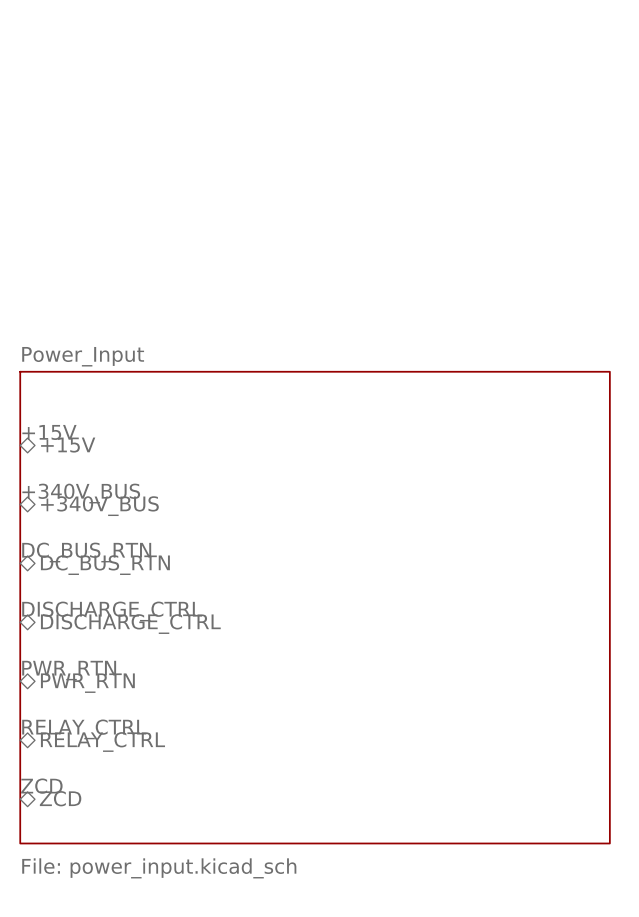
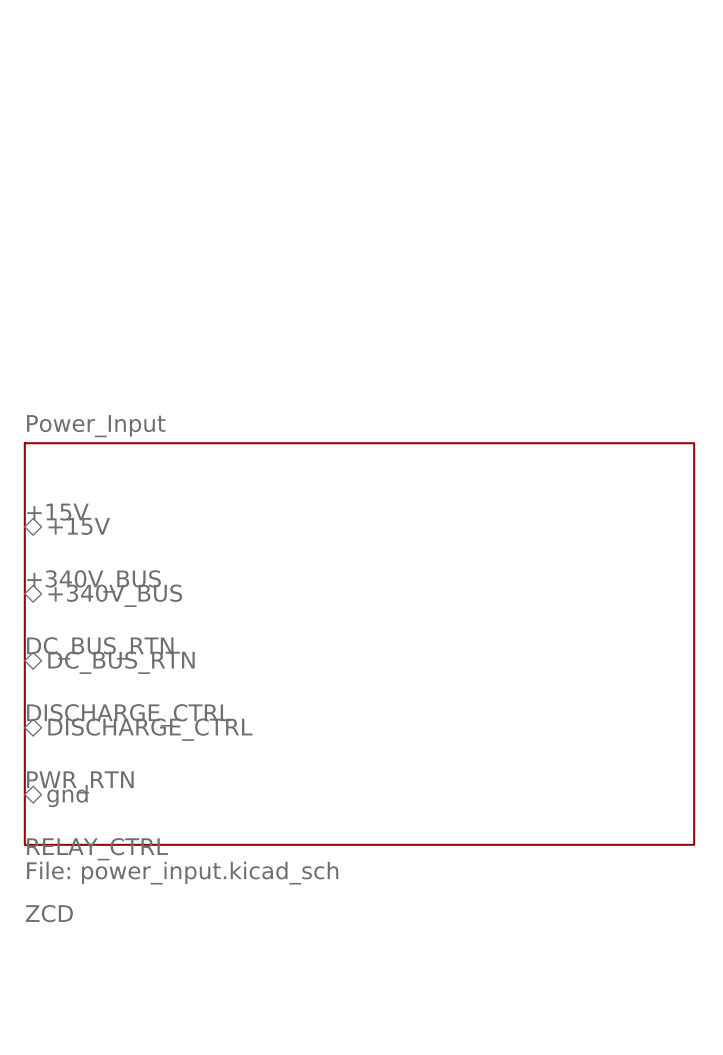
sheet Power_Input: none -> File: power_input.kicad_sch (359, 644)
sheet Power_Input: File: power_input.kicad_sch (315, 607) -> none
sheet pin: PWR_RTN (87, 683) -> gnd (67, 796)
sheet pin: RELAY_CTRL (102, 742) -> none
sheet pin: ZCD (60, 798) -> none

